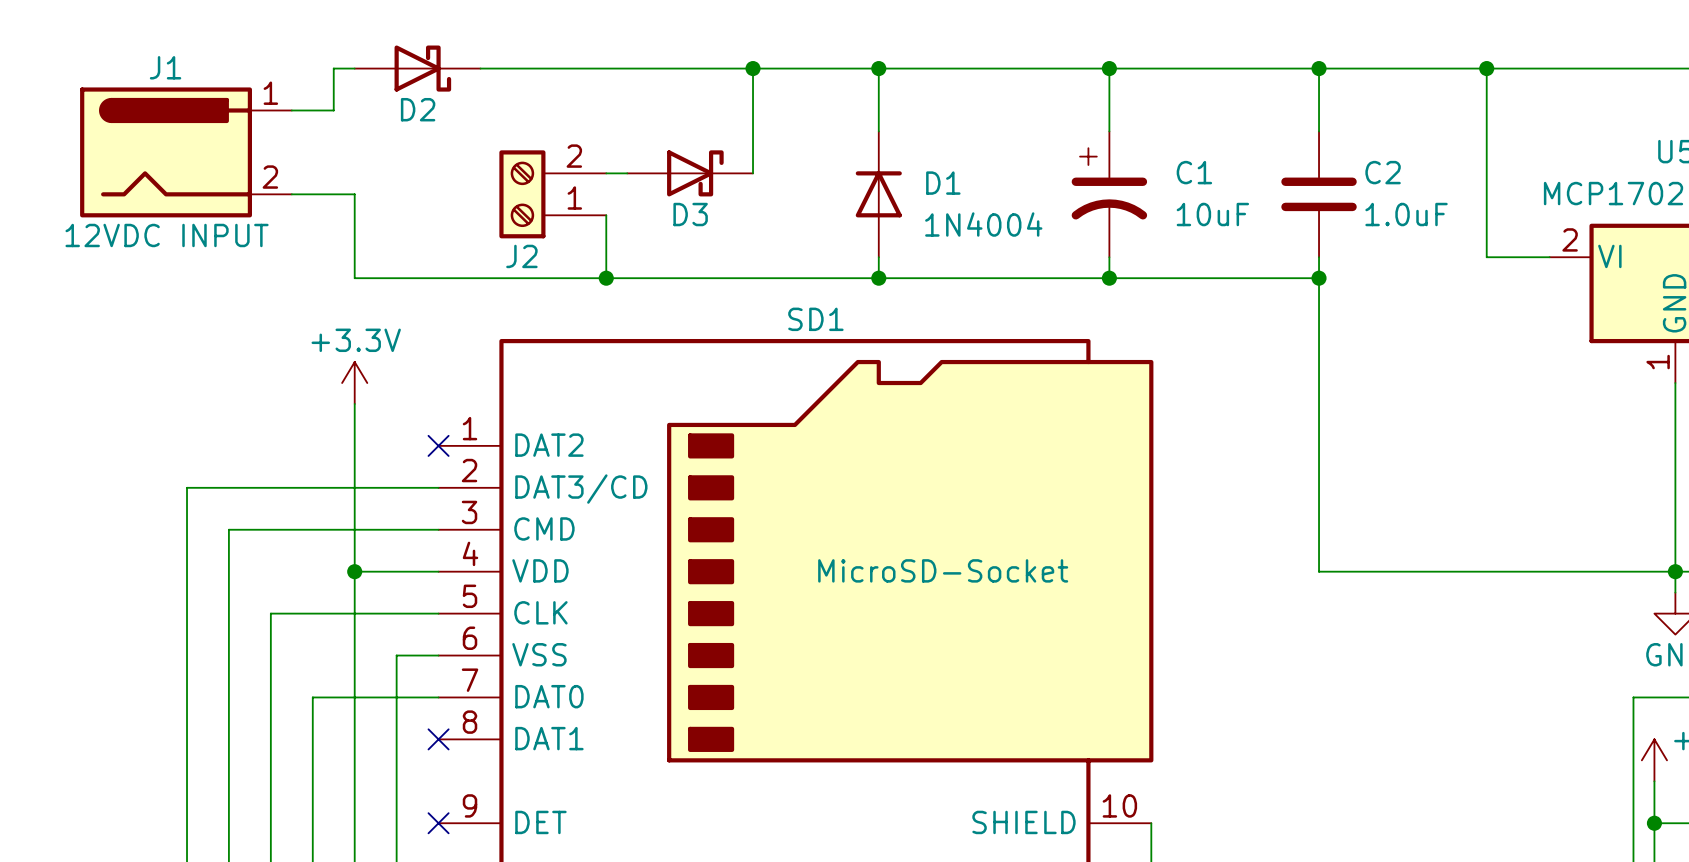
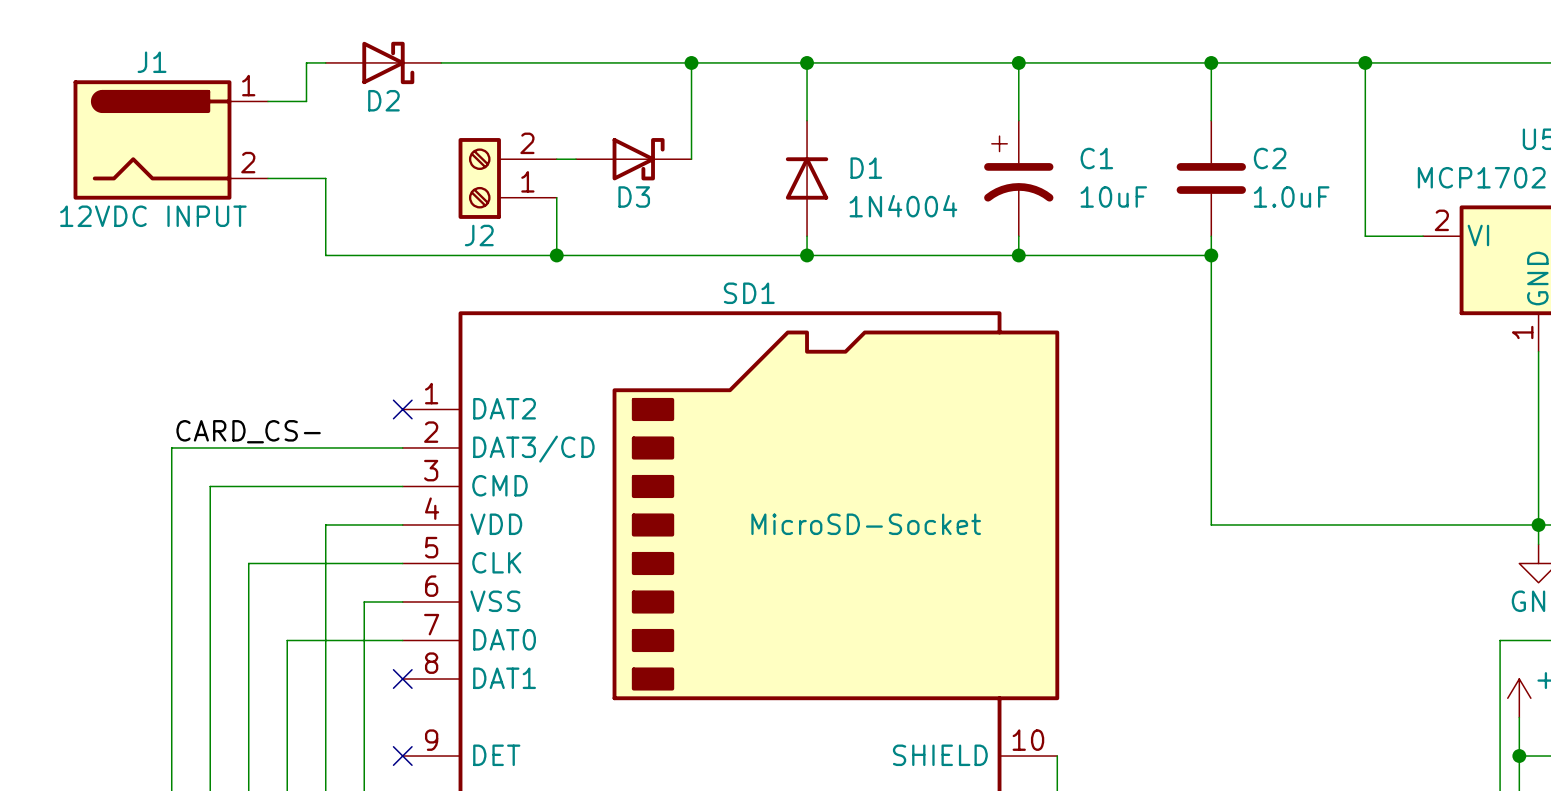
power symbol: +3.3V (354, 383) -> none
wire: (354, 403) (354, 571) -> none
label: none -> CARD_CS- (248, 431)
junction: (354, 571) -> none

